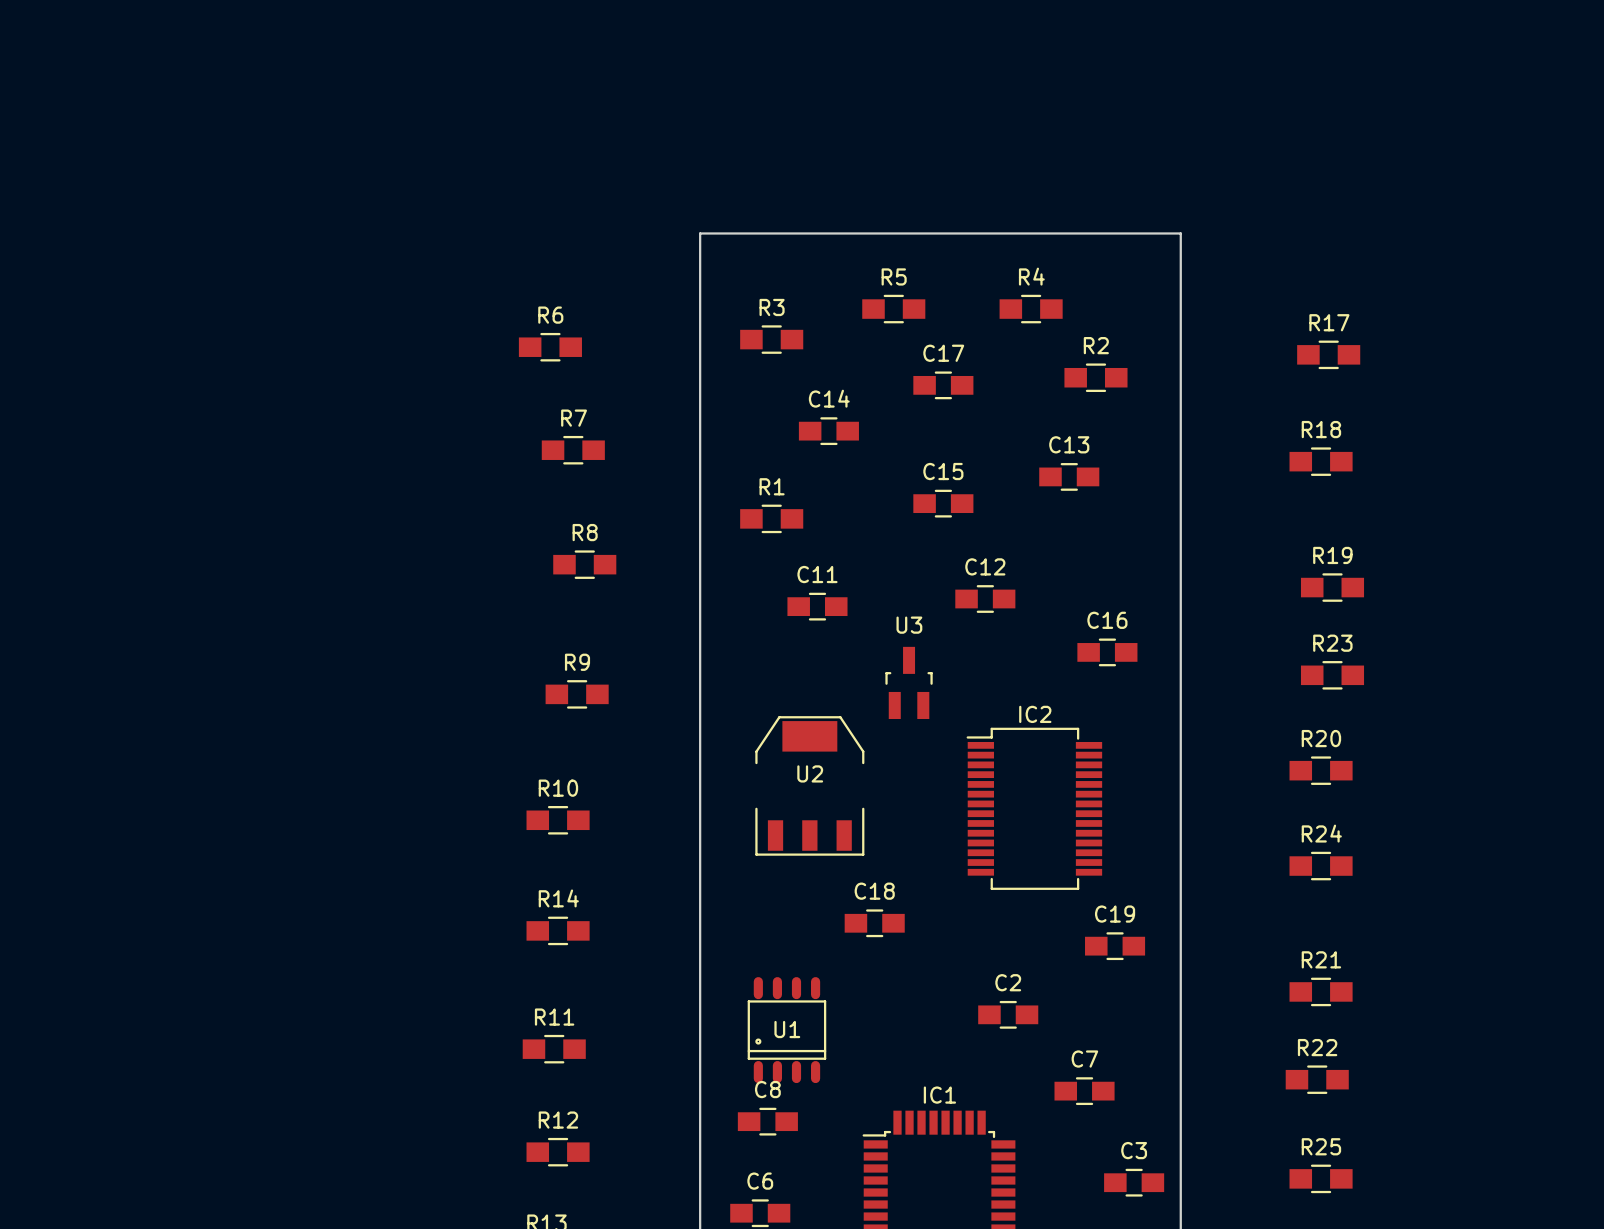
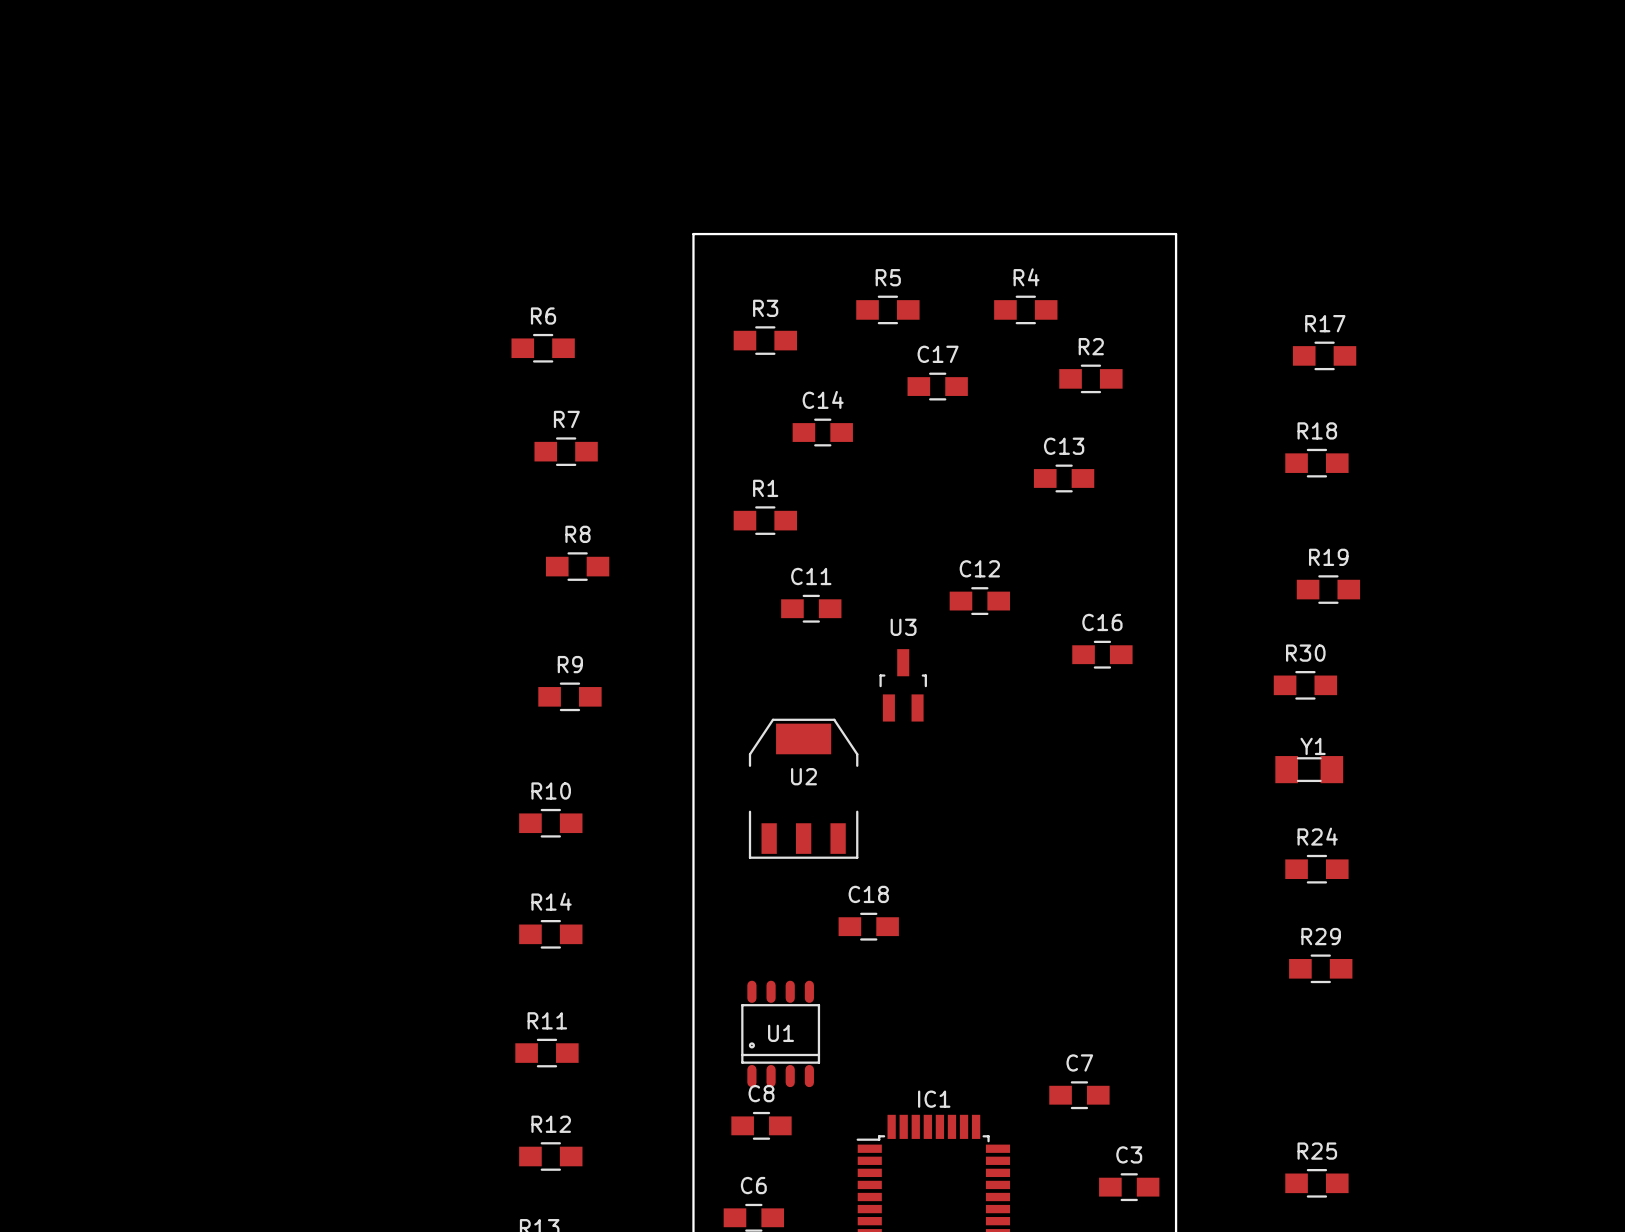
C15: (943, 503) -> none
R23: (1332, 675) -> none
R30: none -> (1305, 685)
Y1: none -> (1309, 769)
R20: (1321, 770) -> none
IC2: (1034, 808) -> none
C19: (1115, 946) -> none
R29: none -> (1320, 968)
R21: (1321, 991) -> none
C2: (1008, 1014) -> none
R22: (1317, 1079) -> none

